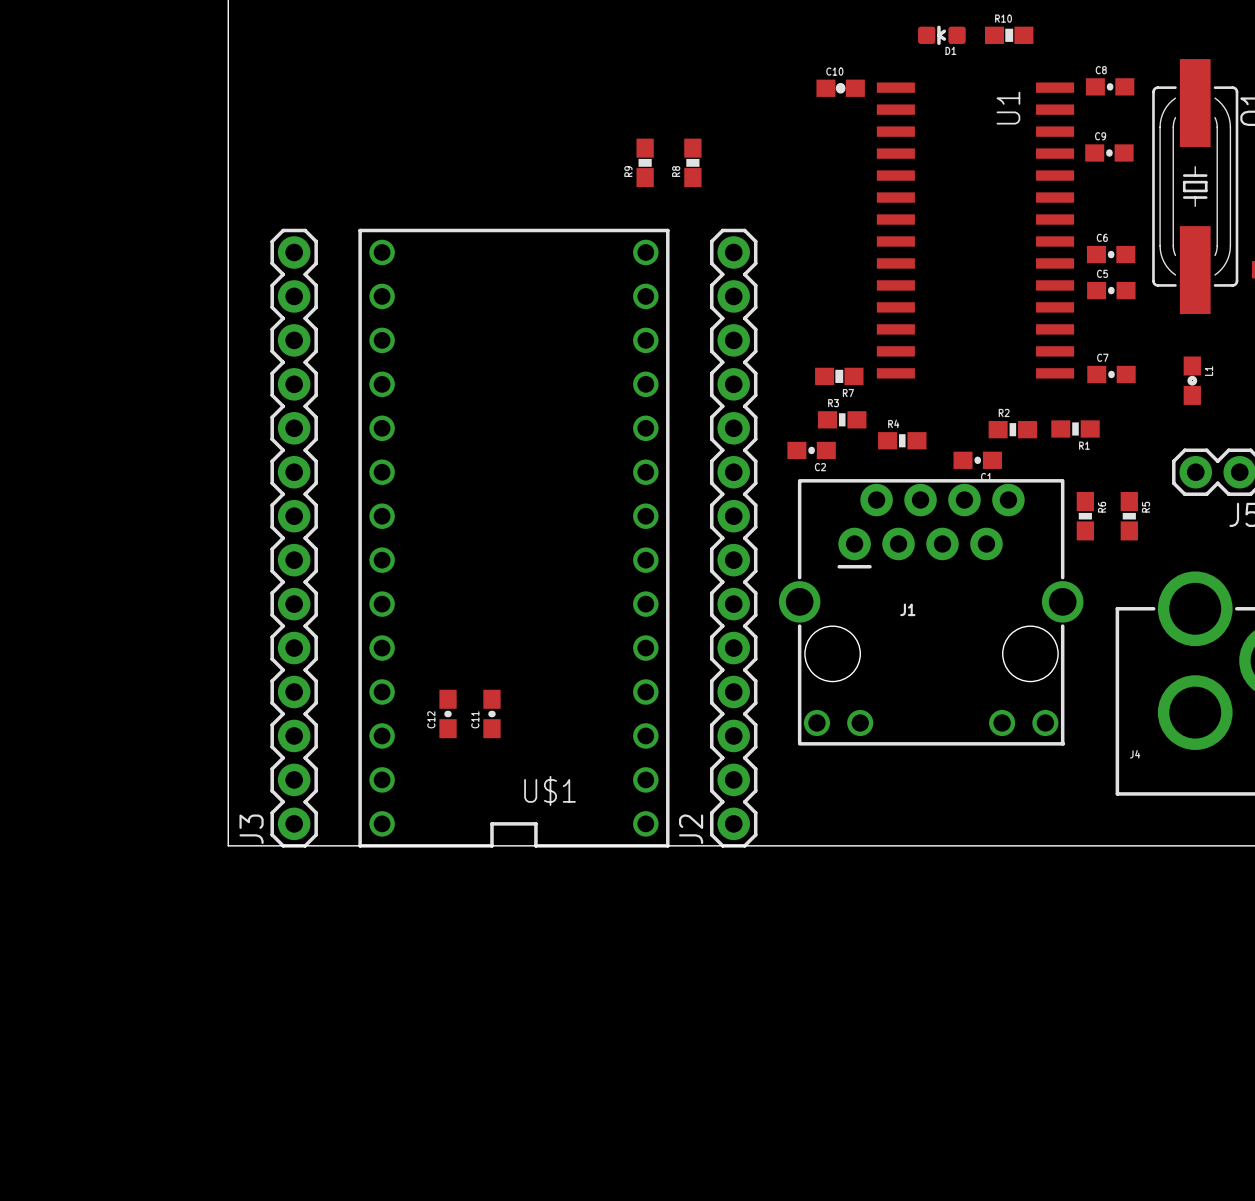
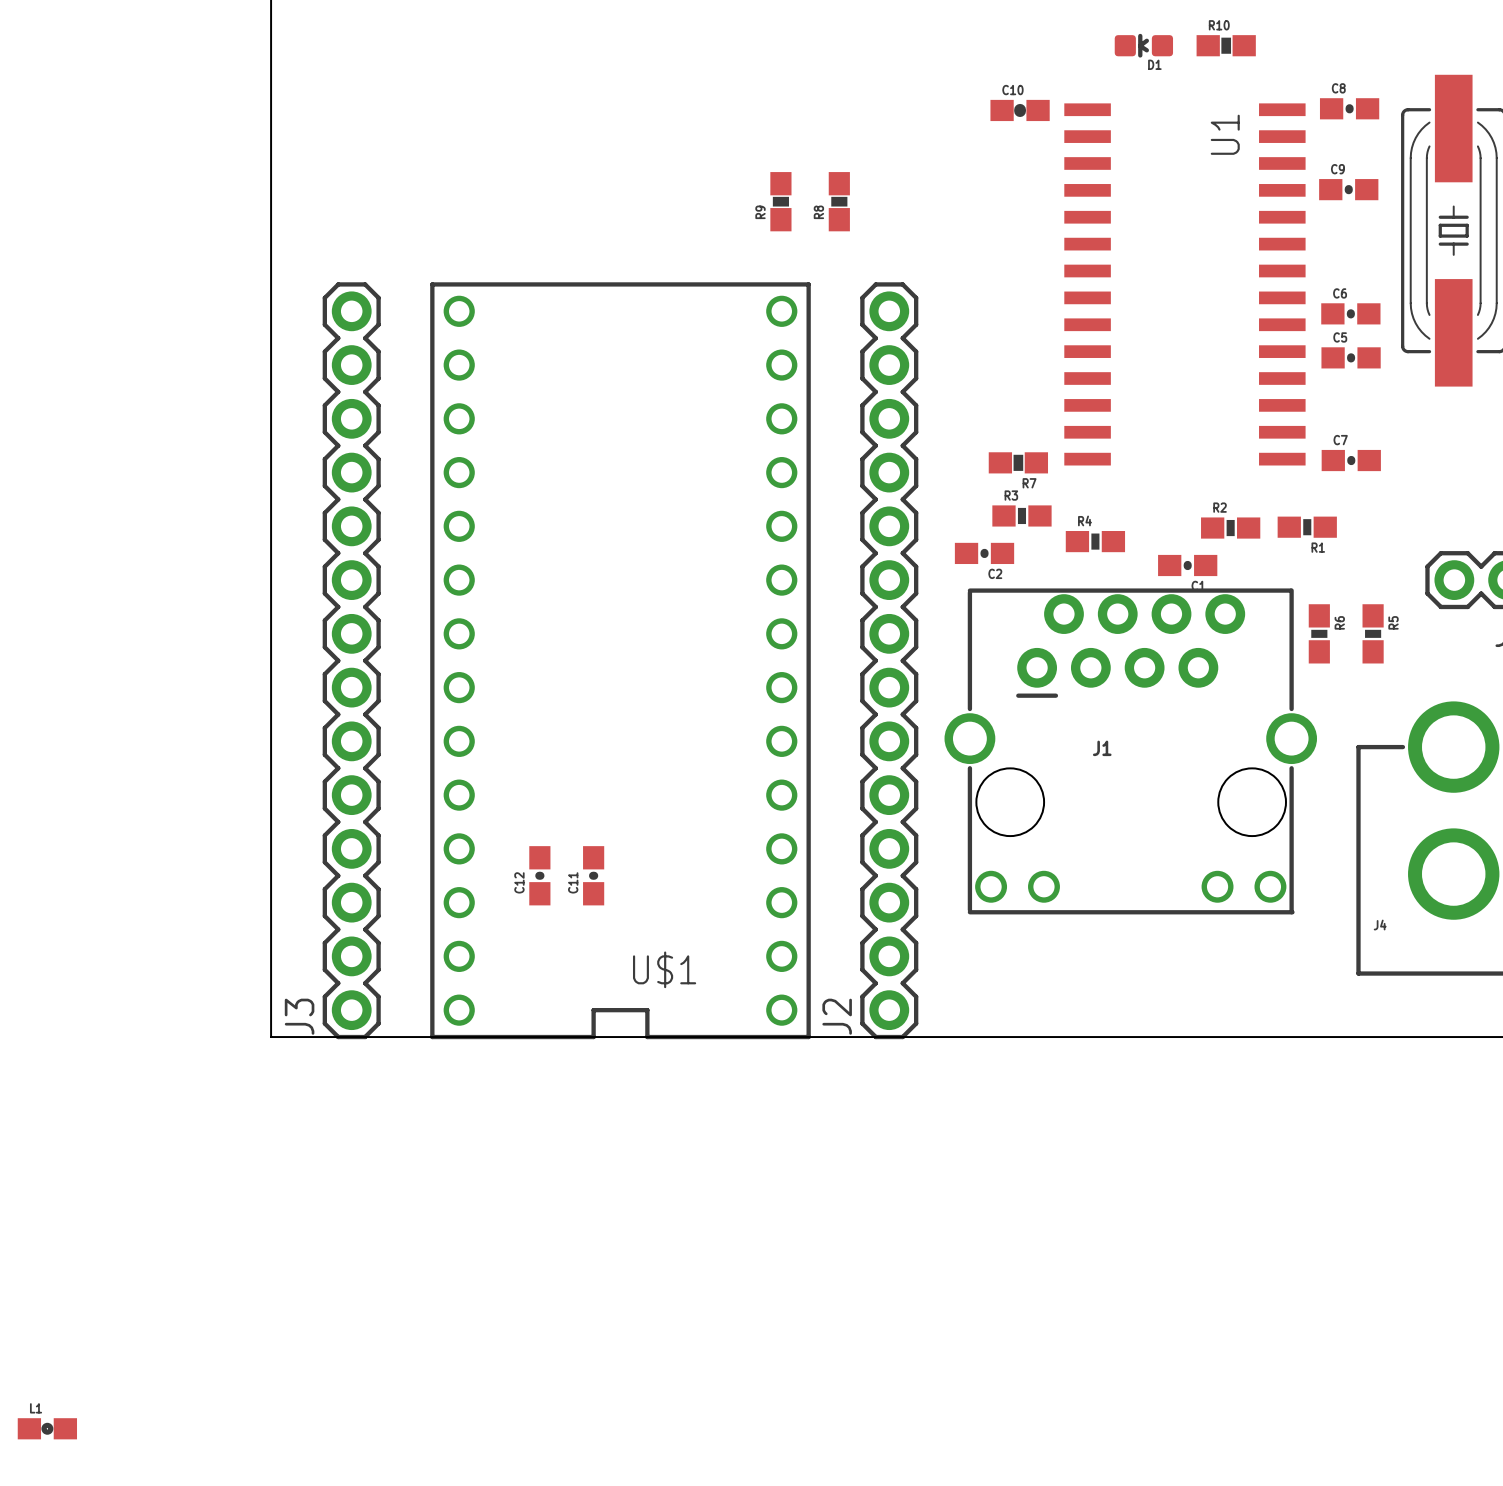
L1 rotation: 0° (1192, 380) -> 90° clockwise (47, 1428)
L1 position: (1192, 380) -> (47, 1428)

